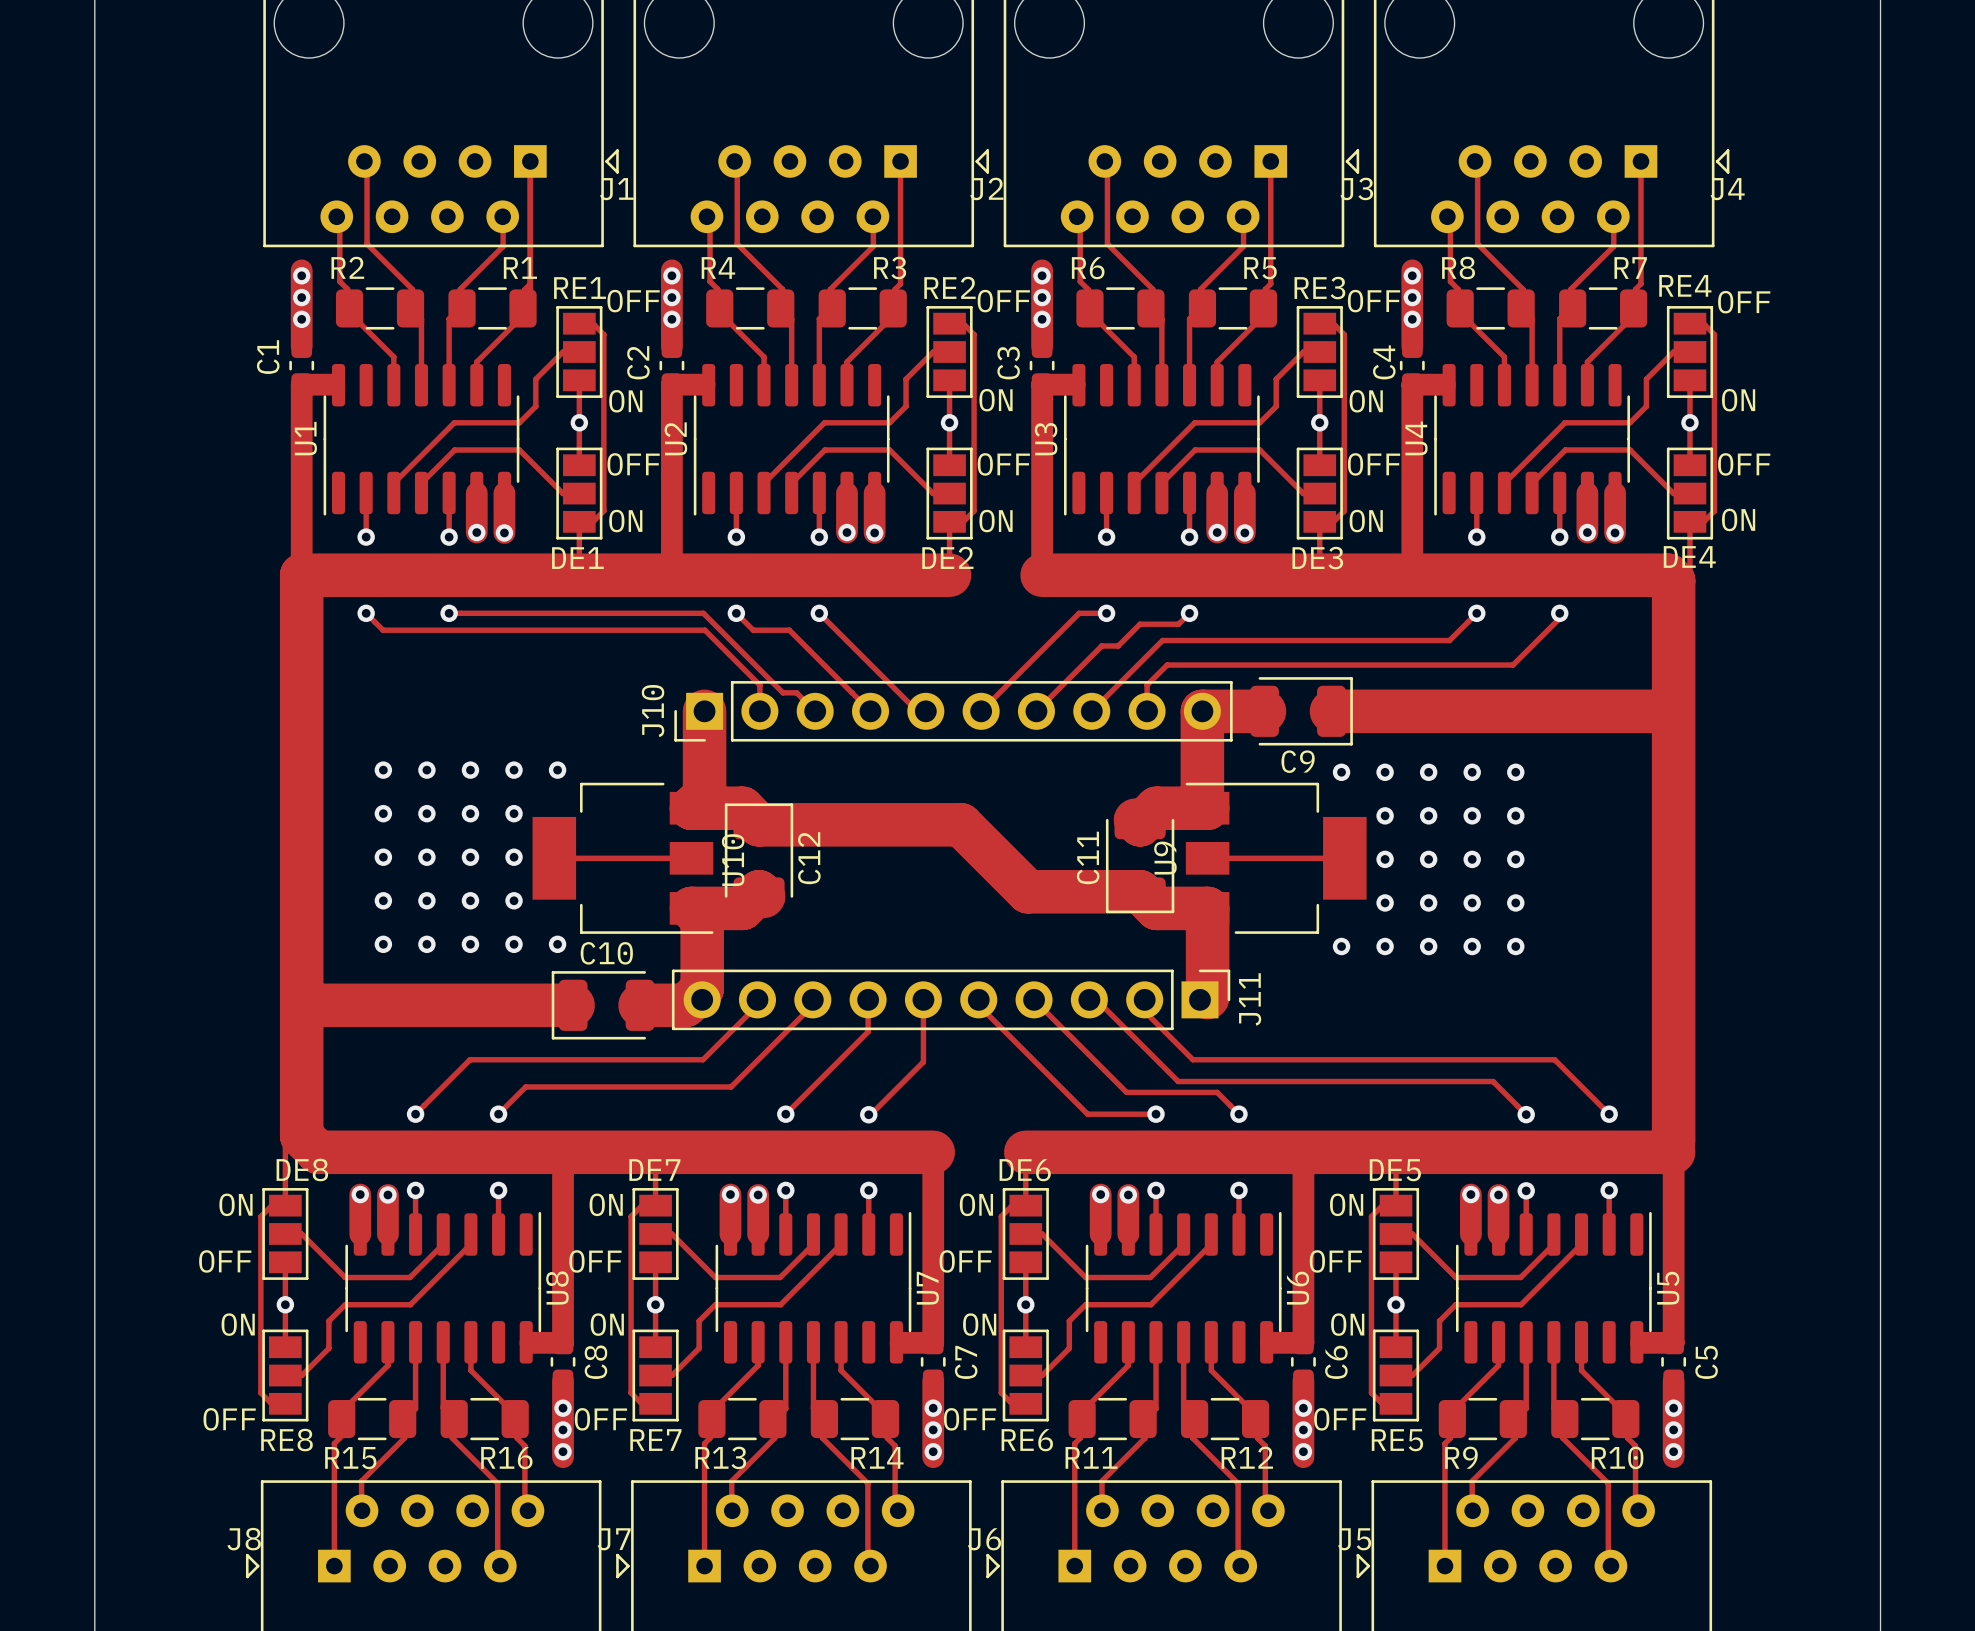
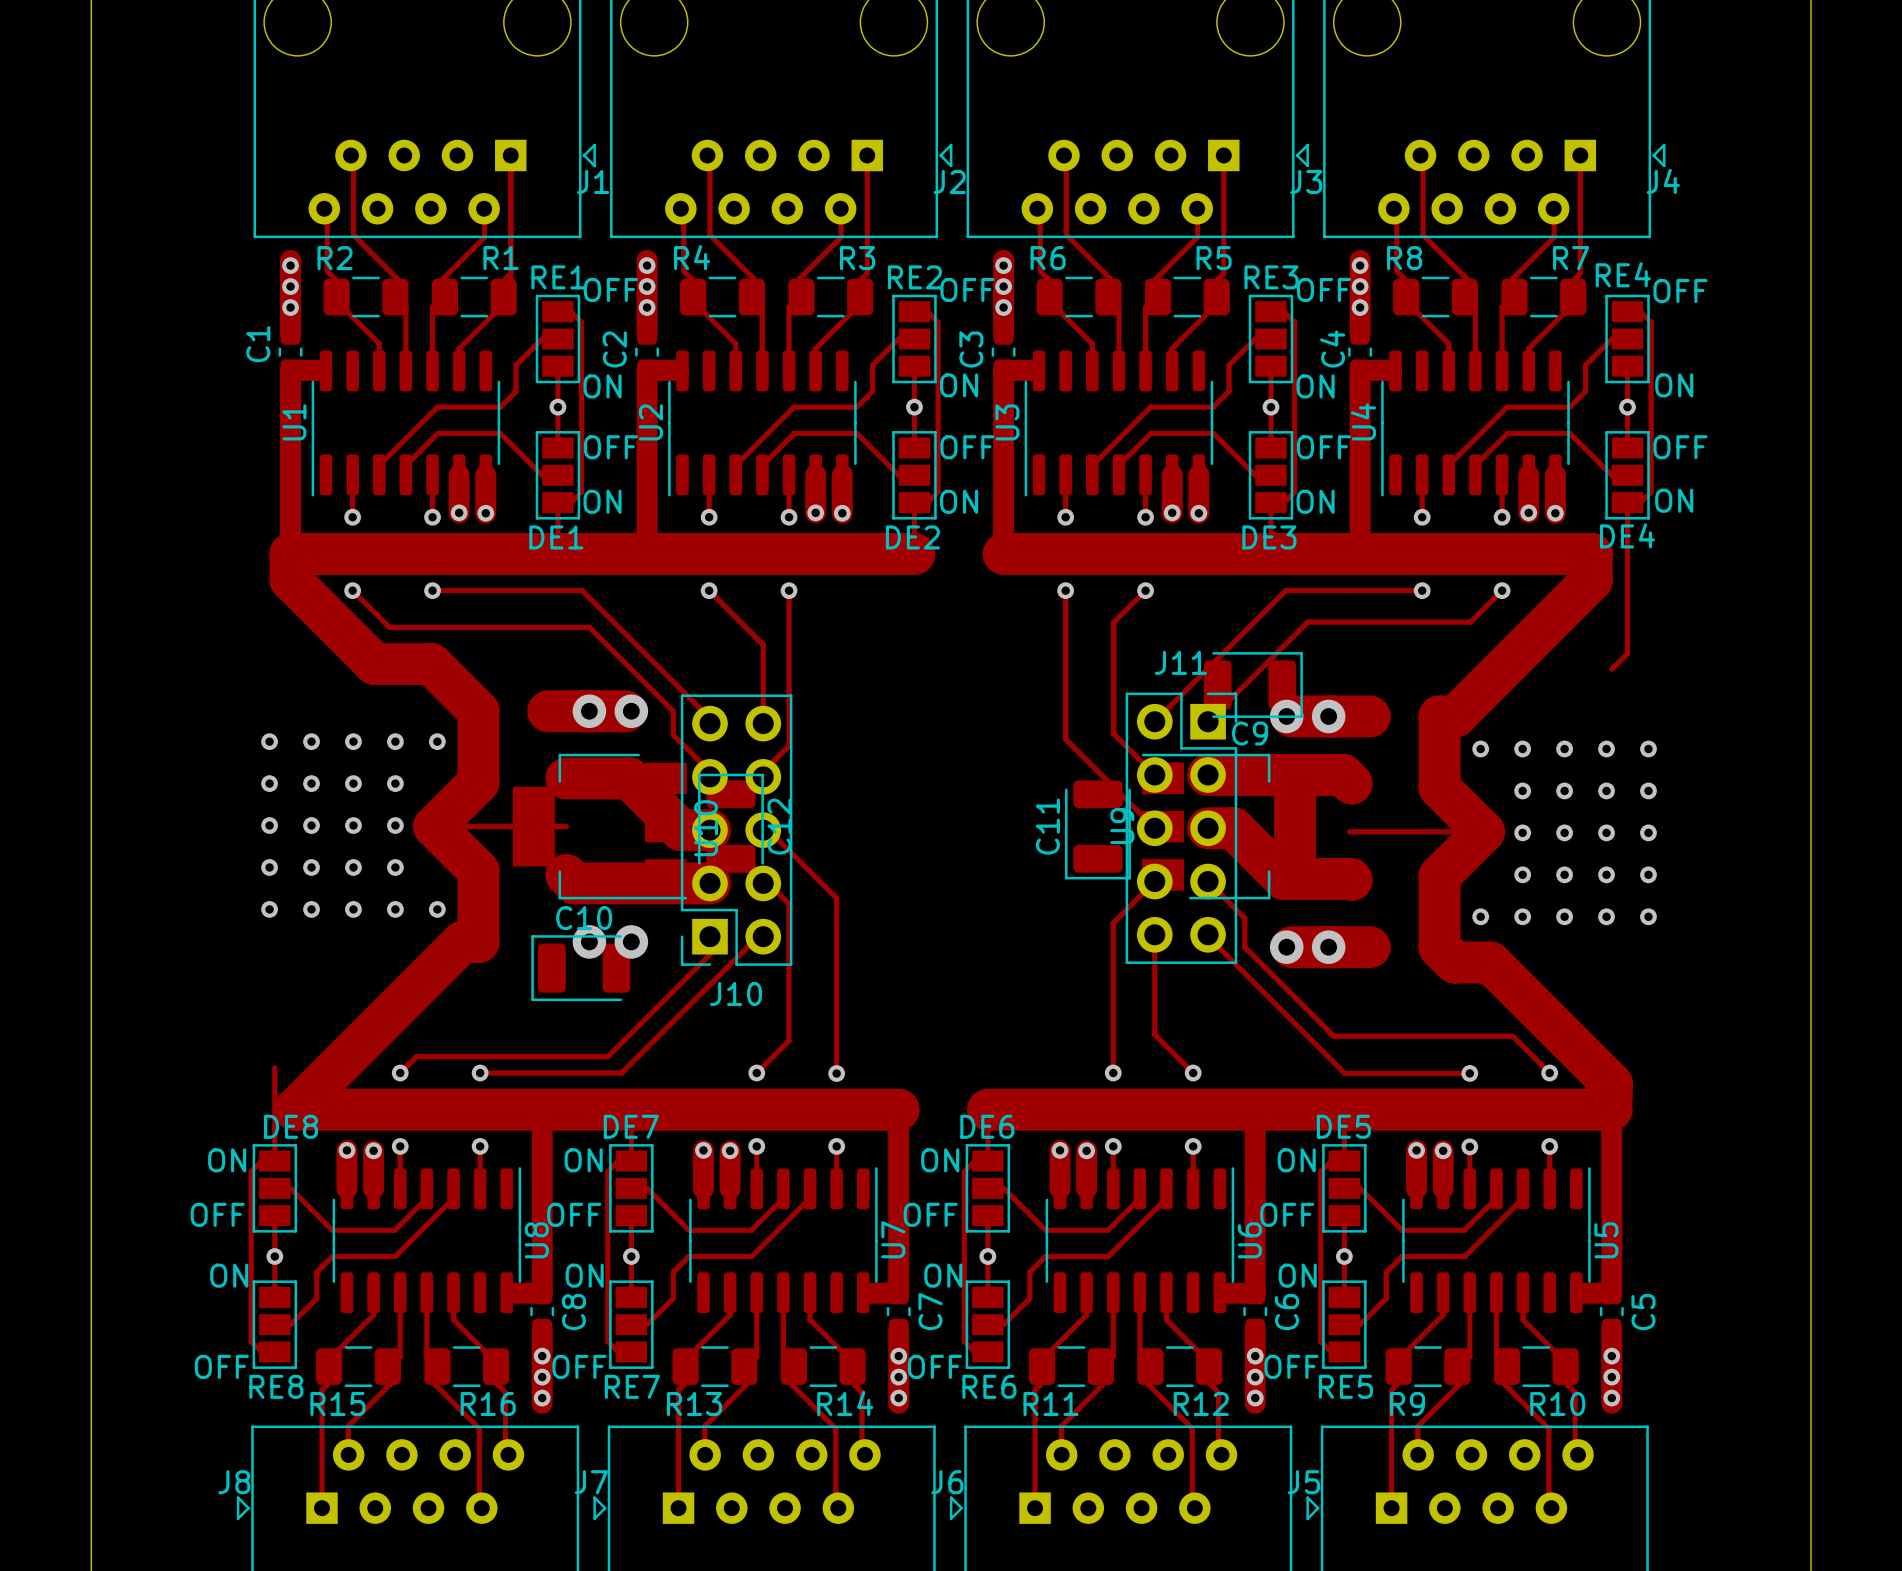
track: (1652, 575) (1668, 575) (1673, 580) (1673, 1125) -> (1591, 553) (1591, 580) (1455, 716) (1439, 716) (1439, 787) (1483, 831) (1439, 876) (1439, 947) (1454, 962) (1490, 962) (1611, 1083)
track: (301, 602) (301, 1135) (318, 1152) -> (290, 579) (374, 664) (431, 664) (478, 711) (478, 782) (434, 826) (478, 870) (478, 941) (462, 941) (294, 1109) (306, 1109)
track: (604, 613) (703, 613) (782, 692) (796, 692) (815, 711) -> (582, 590) (709, 718)
track: (819, 613) (917, 711) (925, 711) -> (789, 590) (789, 745) (763, 771)
track: (1106, 613) (1079, 613) (981, 711) -> (1065, 590) (1065, 739) (1154, 828)
track: (1476, 613) (1449, 640) (1162, 640) (1091, 711) -> (1422, 590) (1285, 590) (1154, 721)
track: none -> (1502, 590) (1470, 622) (1307, 622) (1216, 712)
track: (1559, 618) (1513, 665) (1167, 665) (1147, 685) (1147, 711) -> none
track: (1178, 624) (1140, 624) (1118, 645) (1101, 645) (1036, 711) -> (1135, 601) (1113, 622) (1113, 733) (1154, 775)
track: (383, 630) (704, 630) (759, 685) (759, 711) -> (368, 606) (389, 627) (589, 627) (673, 711) (673, 734) (709, 771)
track: (753, 630) (789, 630) (870, 711) -> (725, 606) (763, 644) (763, 718)
J10 footprint: [674, 681, 1233, 742] -> [680, 694, 793, 966]
J10 name position: J10 (653, 711) -> J10 (736, 994)
track: (704, 711) (704, 795) (691, 808) (742, 808) (759, 824) (961, 824) (1028, 891) (1140, 891) (1156, 908) (1207, 908) (1207, 997) -> none
track: (1264, 711) (1202, 711) (1202, 803) (1207, 808) (1156, 808) (1140, 824) (1135, 820) -> none
track: (1331, 711) (1662, 711) -> none
track: none -> (548, 711) (626, 711)
via: none -> (589, 711)
via: none -> (631, 711)
via: none -> (1286, 716)
track: none -> (1291, 716) (1369, 716)
via: none -> (1328, 716)
via: none -> (269, 741)
via: none -> (311, 741)
via position: (383, 770) -> (353, 741)
via position: (426, 770) -> (395, 741)
via position: (470, 770) -> (437, 741)
via: (514, 770) -> none
via: (557, 770) -> none
via: (1341, 772) -> none
via: (1385, 772) -> none
via: (1428, 772) -> none
via: (1472, 772) -> none
via: (1515, 772) -> none
via: none -> (1480, 748)
via: none -> (1522, 748)
via: none -> (1564, 748)
via: none -> (1606, 748)
via: none -> (1648, 748)
track: none -> (1208, 775) (1343, 775) (1351, 783)
track: none -> (566, 778) (629, 778) (681, 830) (709, 830)
via: none -> (269, 783)
via: none -> (311, 783)
via position: (383, 813) -> (353, 783)
via position: (426, 813) -> (395, 783)
via: (470, 813) -> none
via: (514, 813) -> none
via: (1385, 815) -> none
via: (1428, 815) -> none
via: (1472, 815) -> none
via: (1515, 815) -> none
via: none -> (1522, 790)
via: none -> (1564, 790)
via: none -> (1606, 790)
via: none -> (1648, 790)
track: none -> (763, 824) (836, 898) (836, 1073)
via: none -> (269, 825)
via: none -> (311, 825)
via position: (383, 857) -> (353, 825)
via position: (426, 857) -> (395, 825)
via: (470, 857) -> none
via: (514, 857) -> none
track: (588, 858) (688, 858) -> (432, 826) (528, 826)
track: (1205, 858) (1341, 858) -> (1349, 831) (1480, 831)
via: (1385, 859) -> none
via: (1428, 859) -> none
via: (1472, 859) -> none
via: (1515, 859) -> none
track: none -> (1208, 828) (1233, 828) (1284, 879) (1351, 880)
via: none -> (1522, 832)
via: none -> (1564, 832)
via: none -> (1606, 832)
via: none -> (1648, 832)
track: (763, 896) (759, 891) (742, 908) (691, 908) (702, 919) (702, 988) (685, 1005) (640, 1005) -> none
via: none -> (269, 867)
via: none -> (311, 867)
via position: (383, 900) -> (353, 867)
via position: (426, 900) -> (395, 867)
via: (470, 900) -> none
via: (514, 900) -> none
via: (1385, 902) -> none
via: (1428, 902) -> none
via: (1472, 902) -> none
via: (1515, 902) -> none
track: none -> (566, 874) (574, 883) (709, 883)
via: none -> (1522, 874)
via: none -> (1564, 874)
via: none -> (1606, 874)
via: none -> (1648, 874)
via: none -> (269, 909)
via: none -> (311, 909)
via position: (383, 944) -> (353, 909)
via position: (426, 944) -> (395, 909)
via position: (470, 944) -> (437, 909)
via: (514, 944) -> none
via: (557, 944) -> none
via: (1341, 946) -> none
via: (1385, 946) -> none
via: (1428, 946) -> none
via: (1472, 946) -> none
via position: (1515, 946) -> (1480, 916)
via: none -> (1522, 916)
via: none -> (1564, 916)
via: none -> (1606, 916)
via: none -> (1648, 916)
J11 footprint: [671, 969, 1231, 1031] -> [1125, 692, 1238, 964]
via: none -> (589, 941)
via: none -> (631, 941)
via: none -> (1286, 947)
track: none -> (1291, 947) (1369, 947)
via: none -> (1328, 947)
track: (1034, 999) (1126, 1092) (1217, 1092) -> (1154, 934) (1154, 1034) (1172, 1052)
track: (1089, 999) (1096, 999) (1178, 1081) (1493, 1081) (1526, 1114) -> (1208, 936) (1344, 1073) (1469, 1073)
J11 name position: J11 (1250, 999) -> J11 (1180, 662)
track: (301, 1005) (573, 1005) -> none
track: (757, 1005) (703, 1059) (470, 1059) (432, 1097) -> (709, 931) (709, 954) (607, 1056) (416, 1056)
track: (812, 1005) (731, 1086) (525, 1086) (498, 1114) -> (763, 931) (621, 1073) (480, 1073)
track: (868, 1005) (868, 1031) (819, 1080) -> (763, 878) (788, 903) (788, 1040)
track: (923, 1005) (923, 1061) (870, 1114) -> none
track: (978, 1005) (1087, 1114) (1156, 1114) -> (1154, 881) (1113, 923) (1113, 1073)
track: (1144, 1011) (1192, 1059) (1554, 1059) (1571, 1076) -> (1208, 881) (1244, 918) (1244, 947) (1333, 1036) (1513, 1036)

